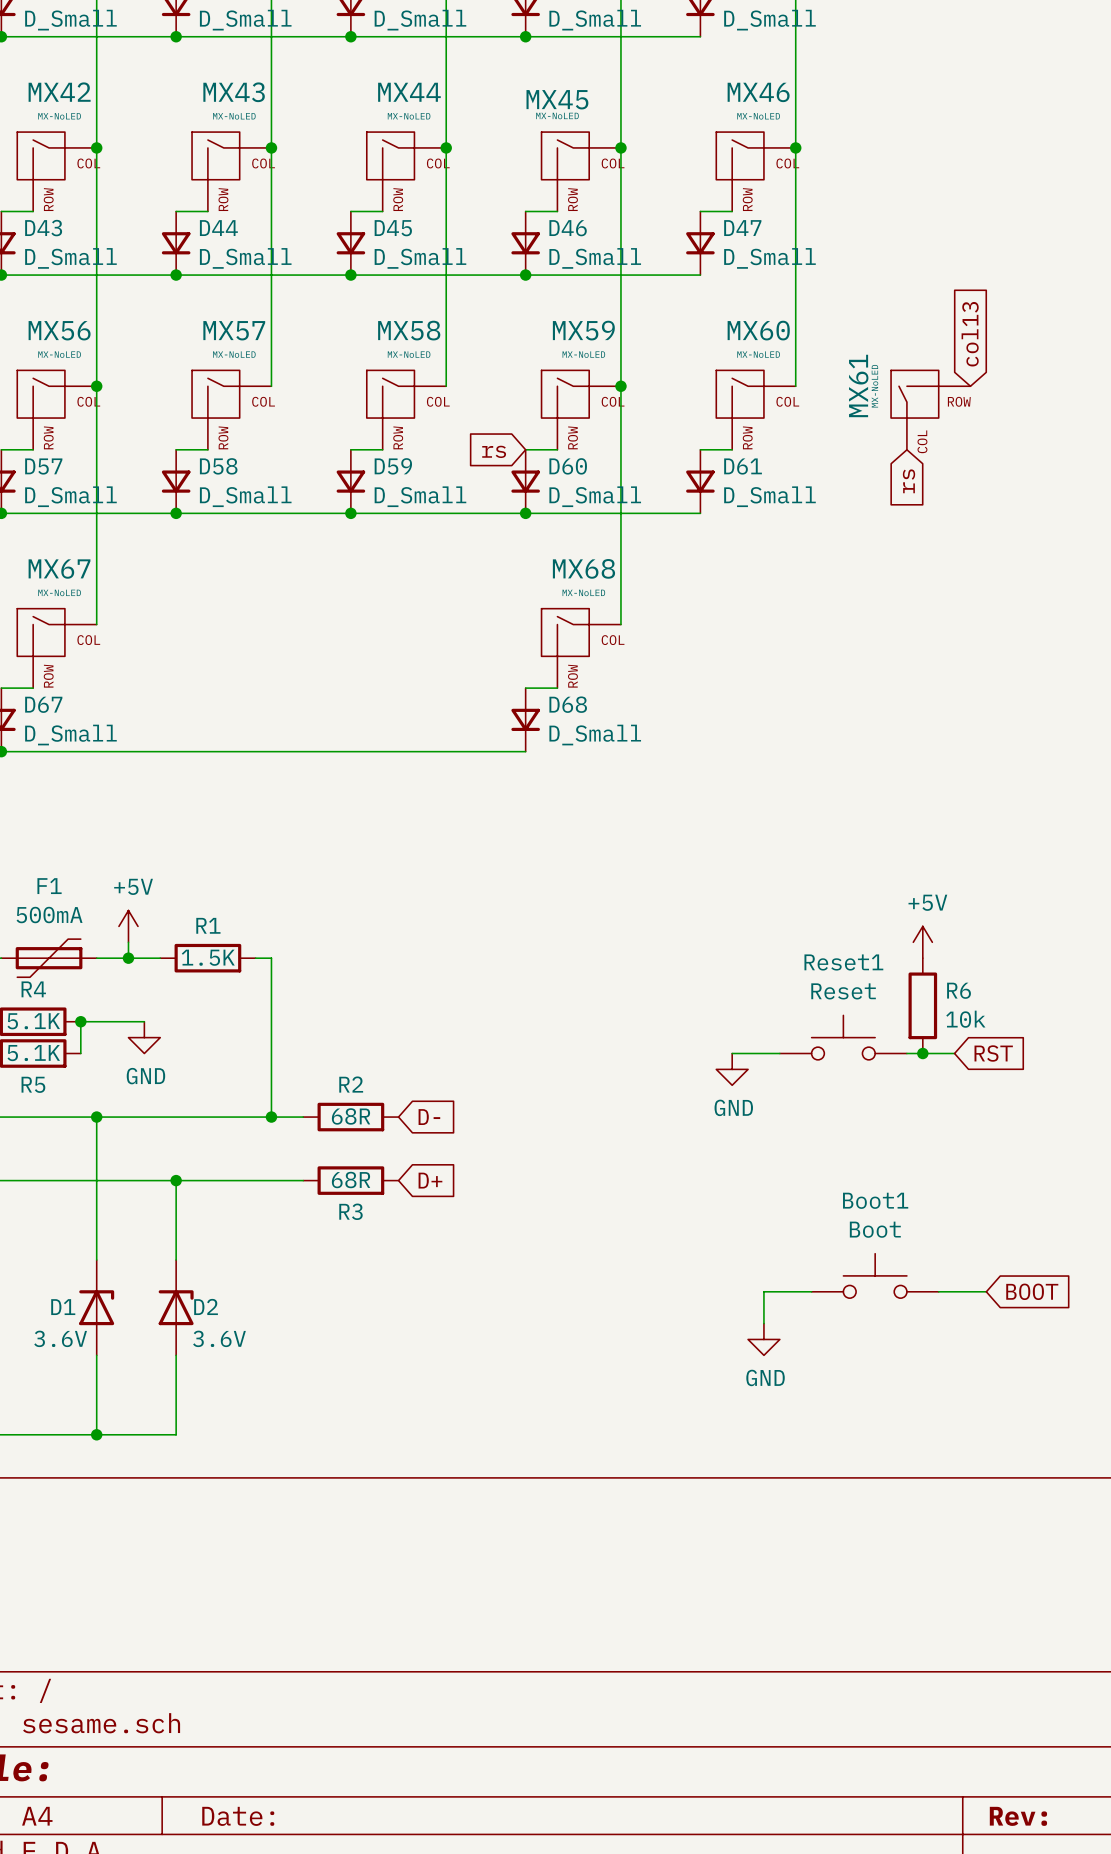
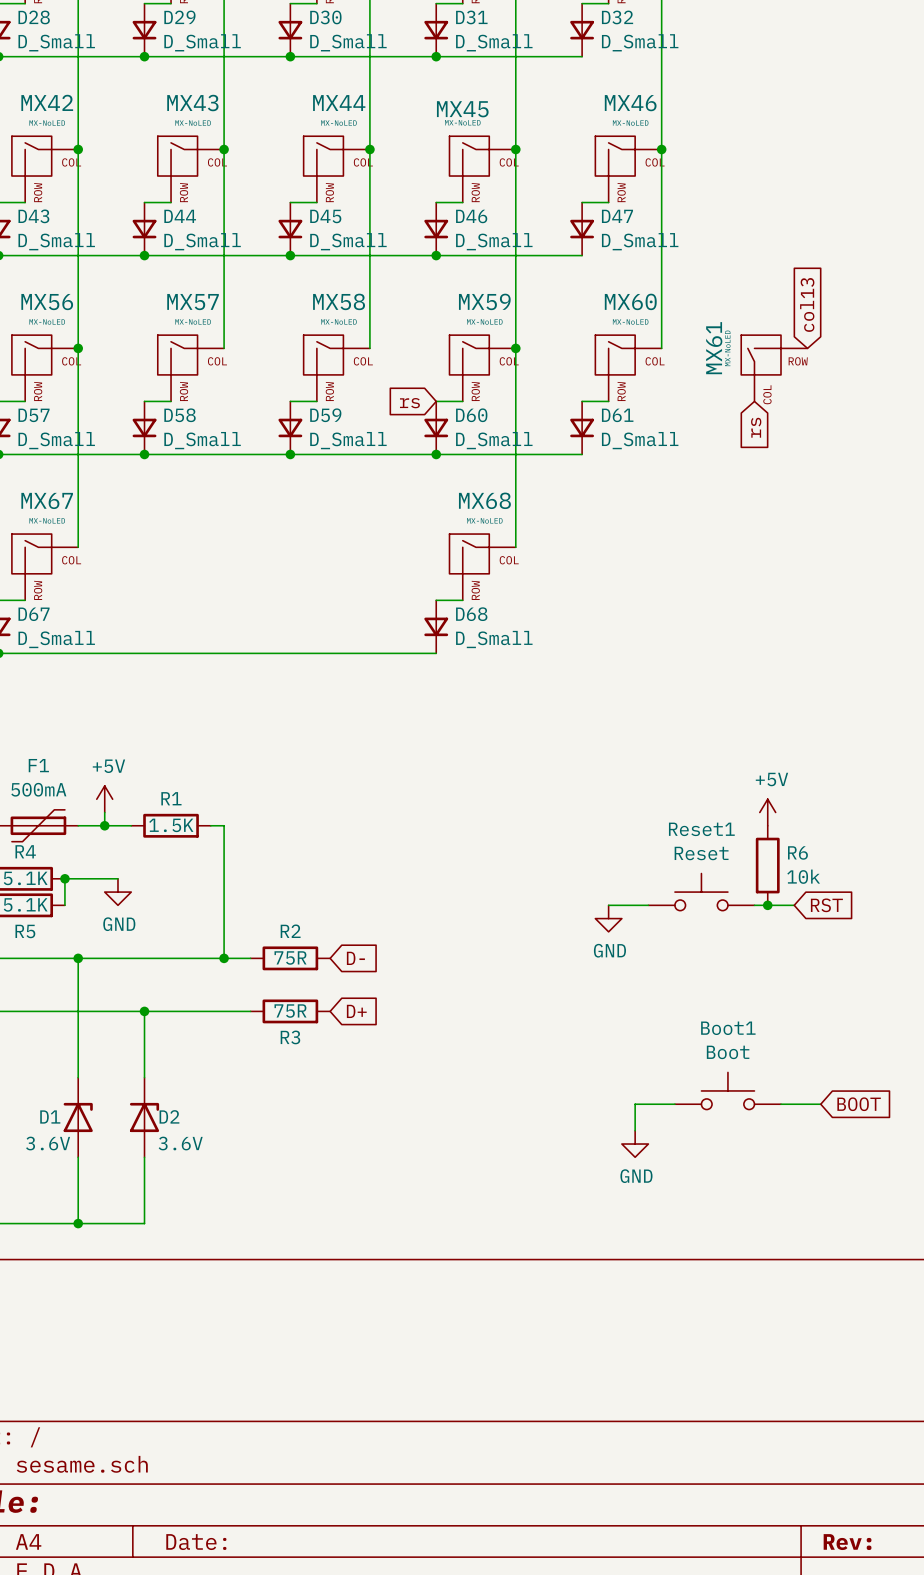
R2 value: 68R (351, 1116) -> 75R (290, 957)
R3 value: 68R (351, 1180) -> 75R (290, 1011)

